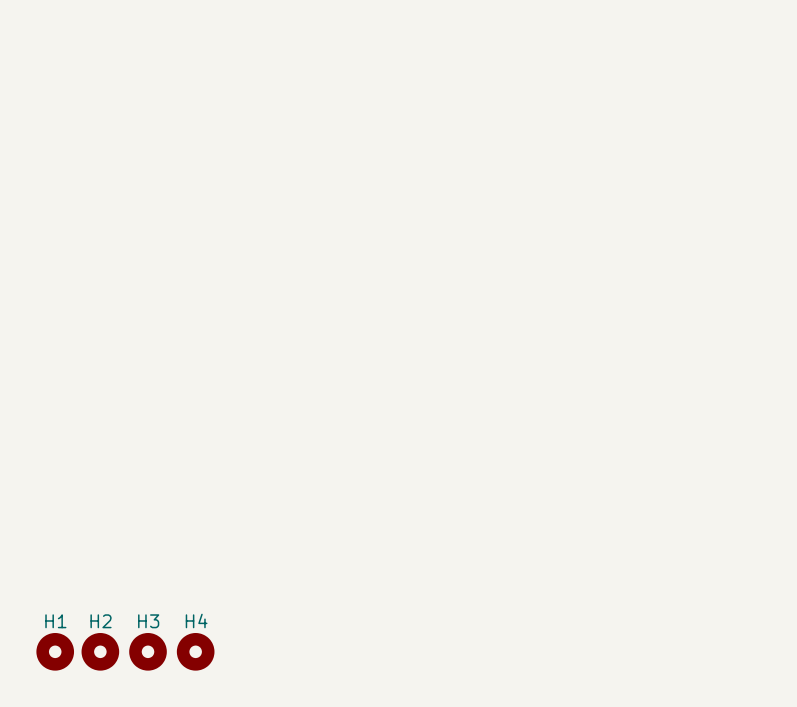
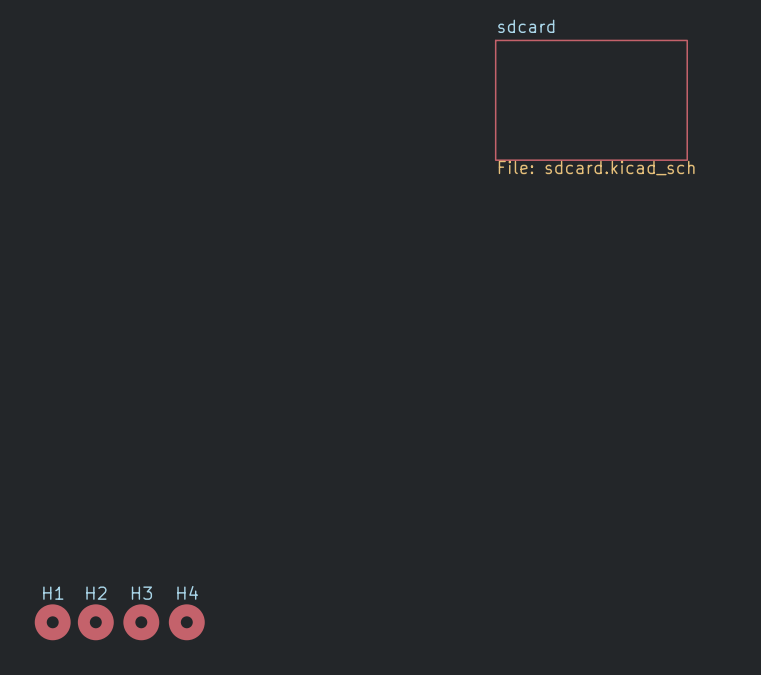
sheet sdcard: none -> File: sdcard.kicad_sch (591, 100)

